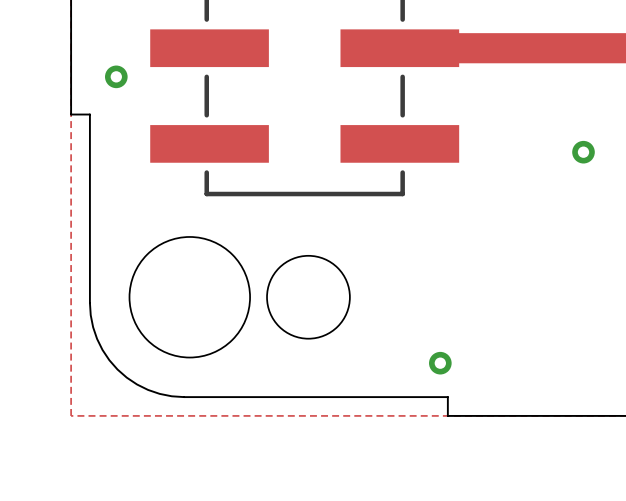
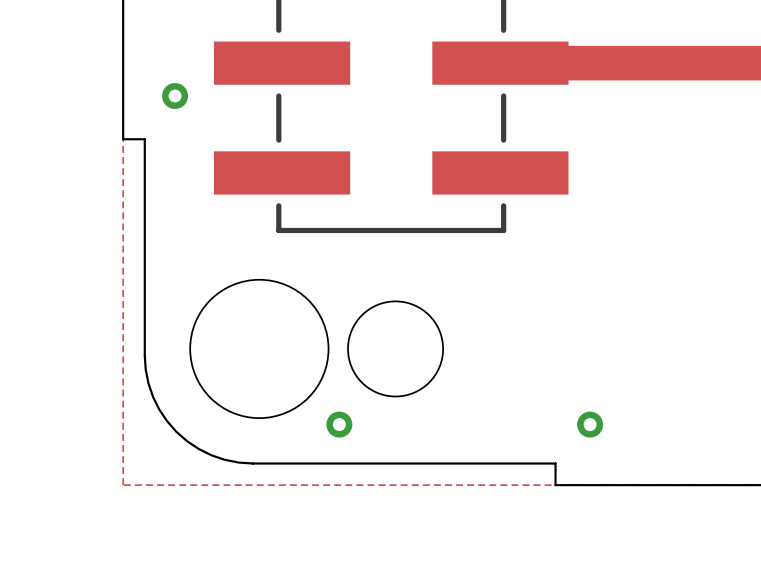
via: (583, 152) -> none
via: none -> (339, 424)
via position: (440, 363) -> (590, 424)

